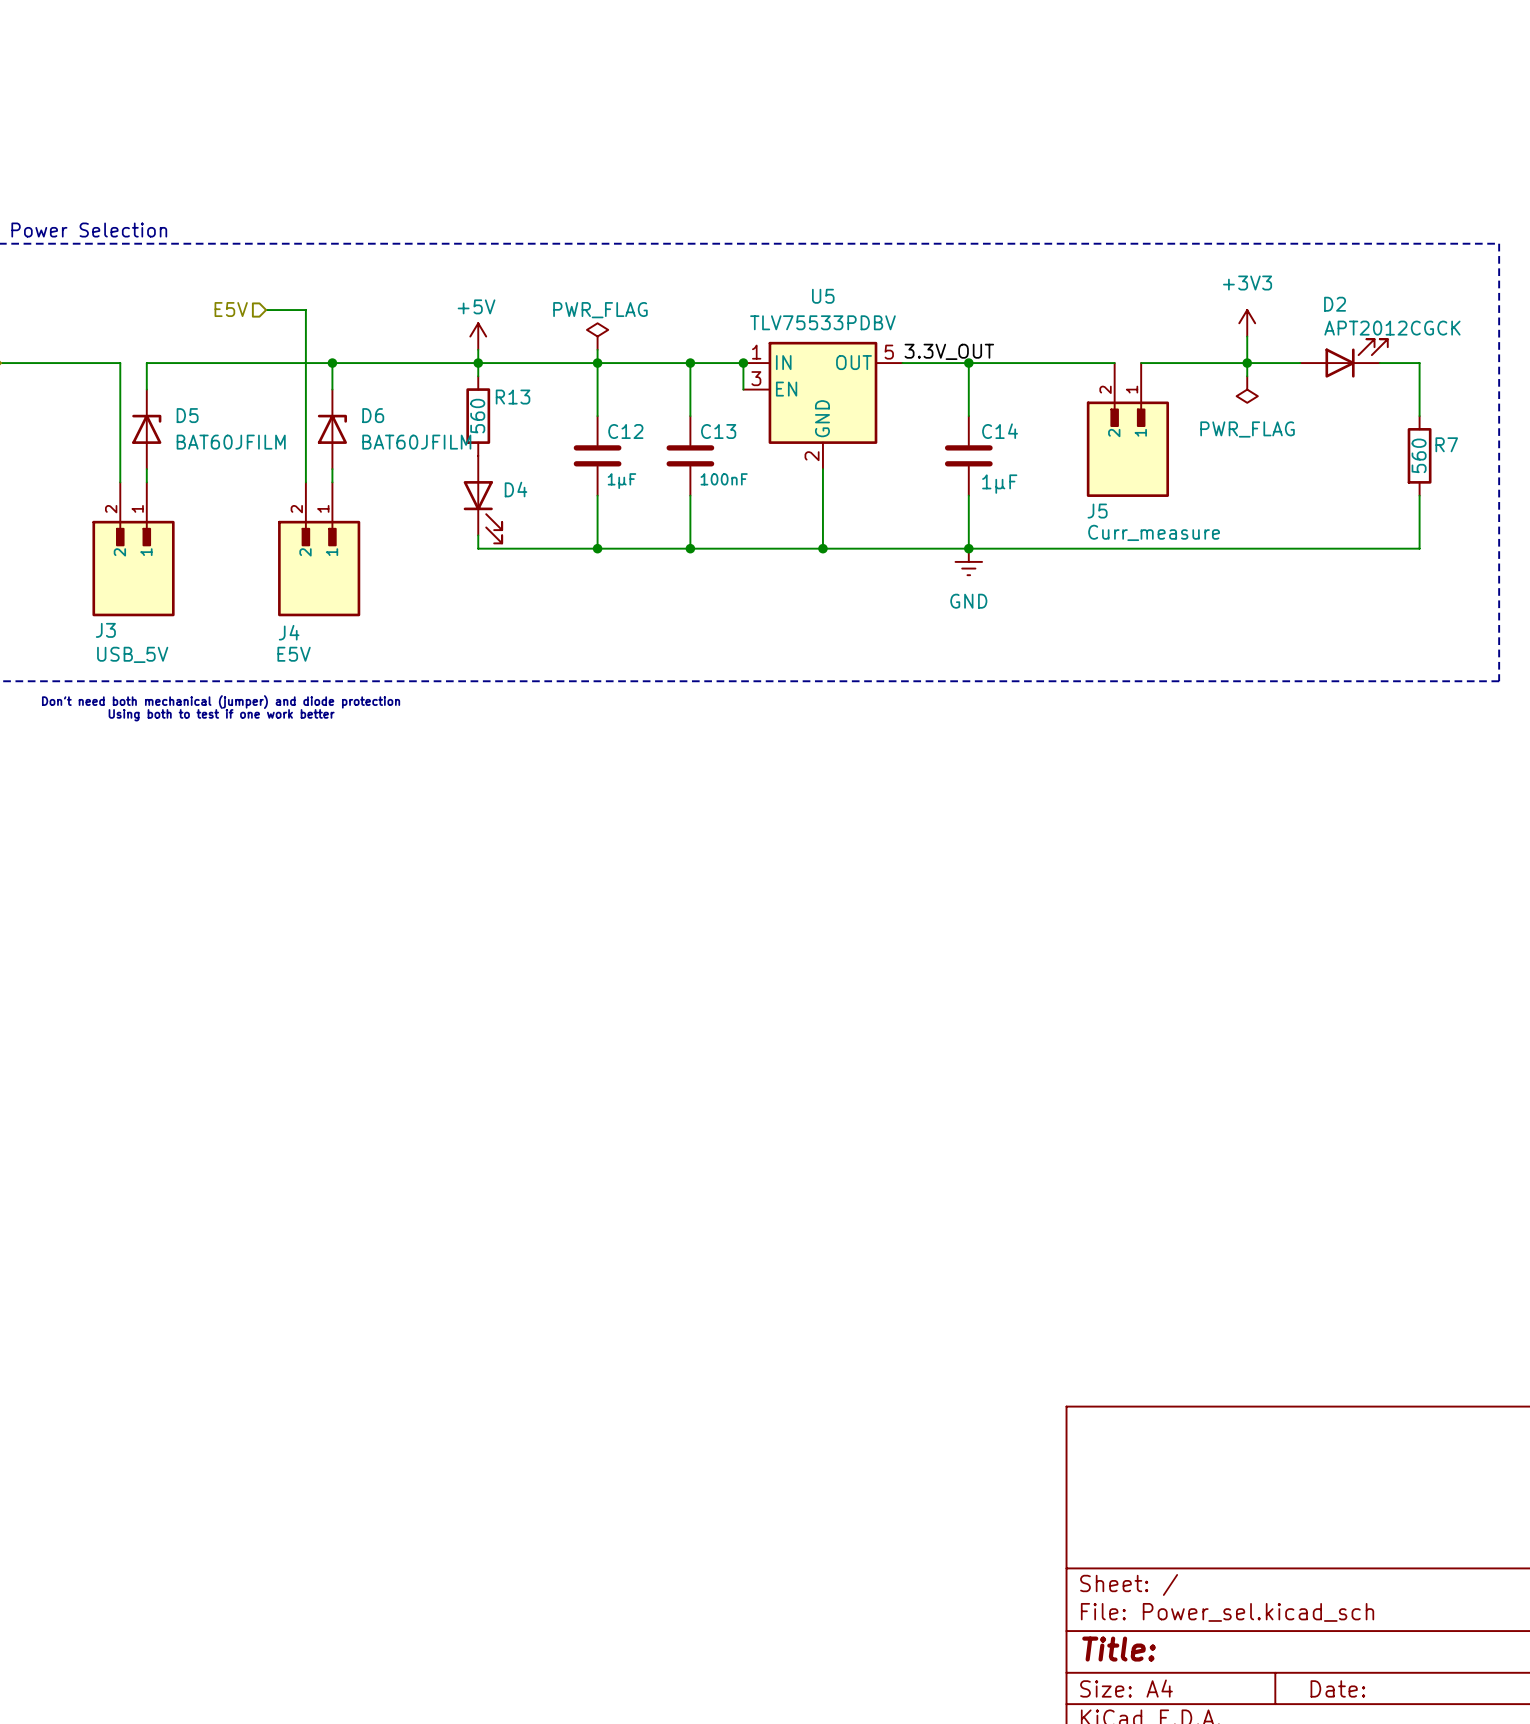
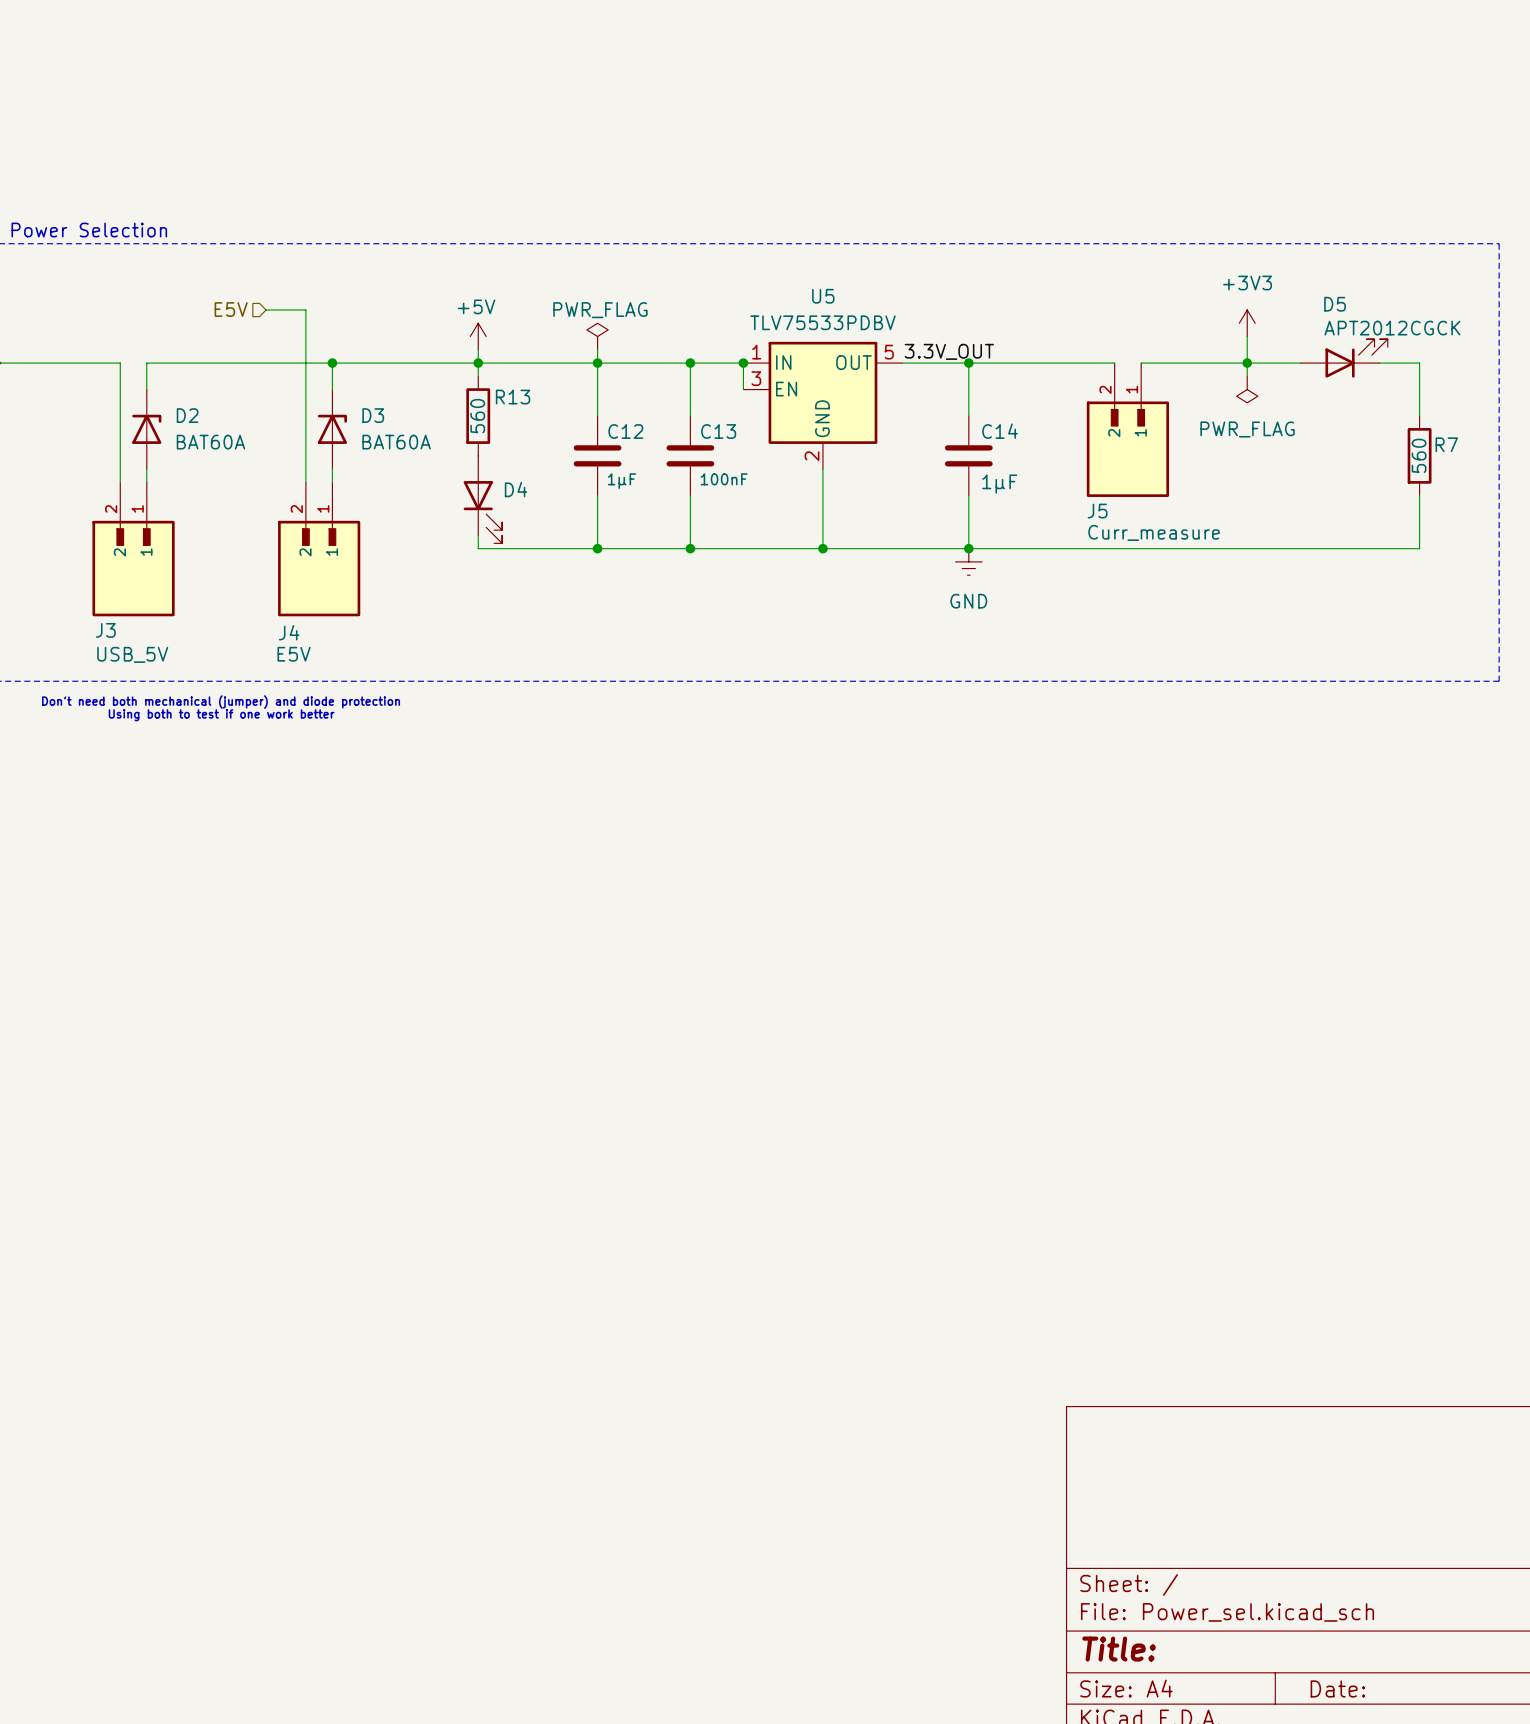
D2 name: D2 (1335, 304) -> D5 (1335, 304)
D5 name: D5 (187, 415) -> D2 (187, 415)
D6 name: D6 (373, 415) -> D3 (373, 415)
D5 value: BAT60JFILM (231, 442) -> BAT60A (210, 442)
D6 value: BAT60JFILM (416, 442) -> BAT60A (396, 442)

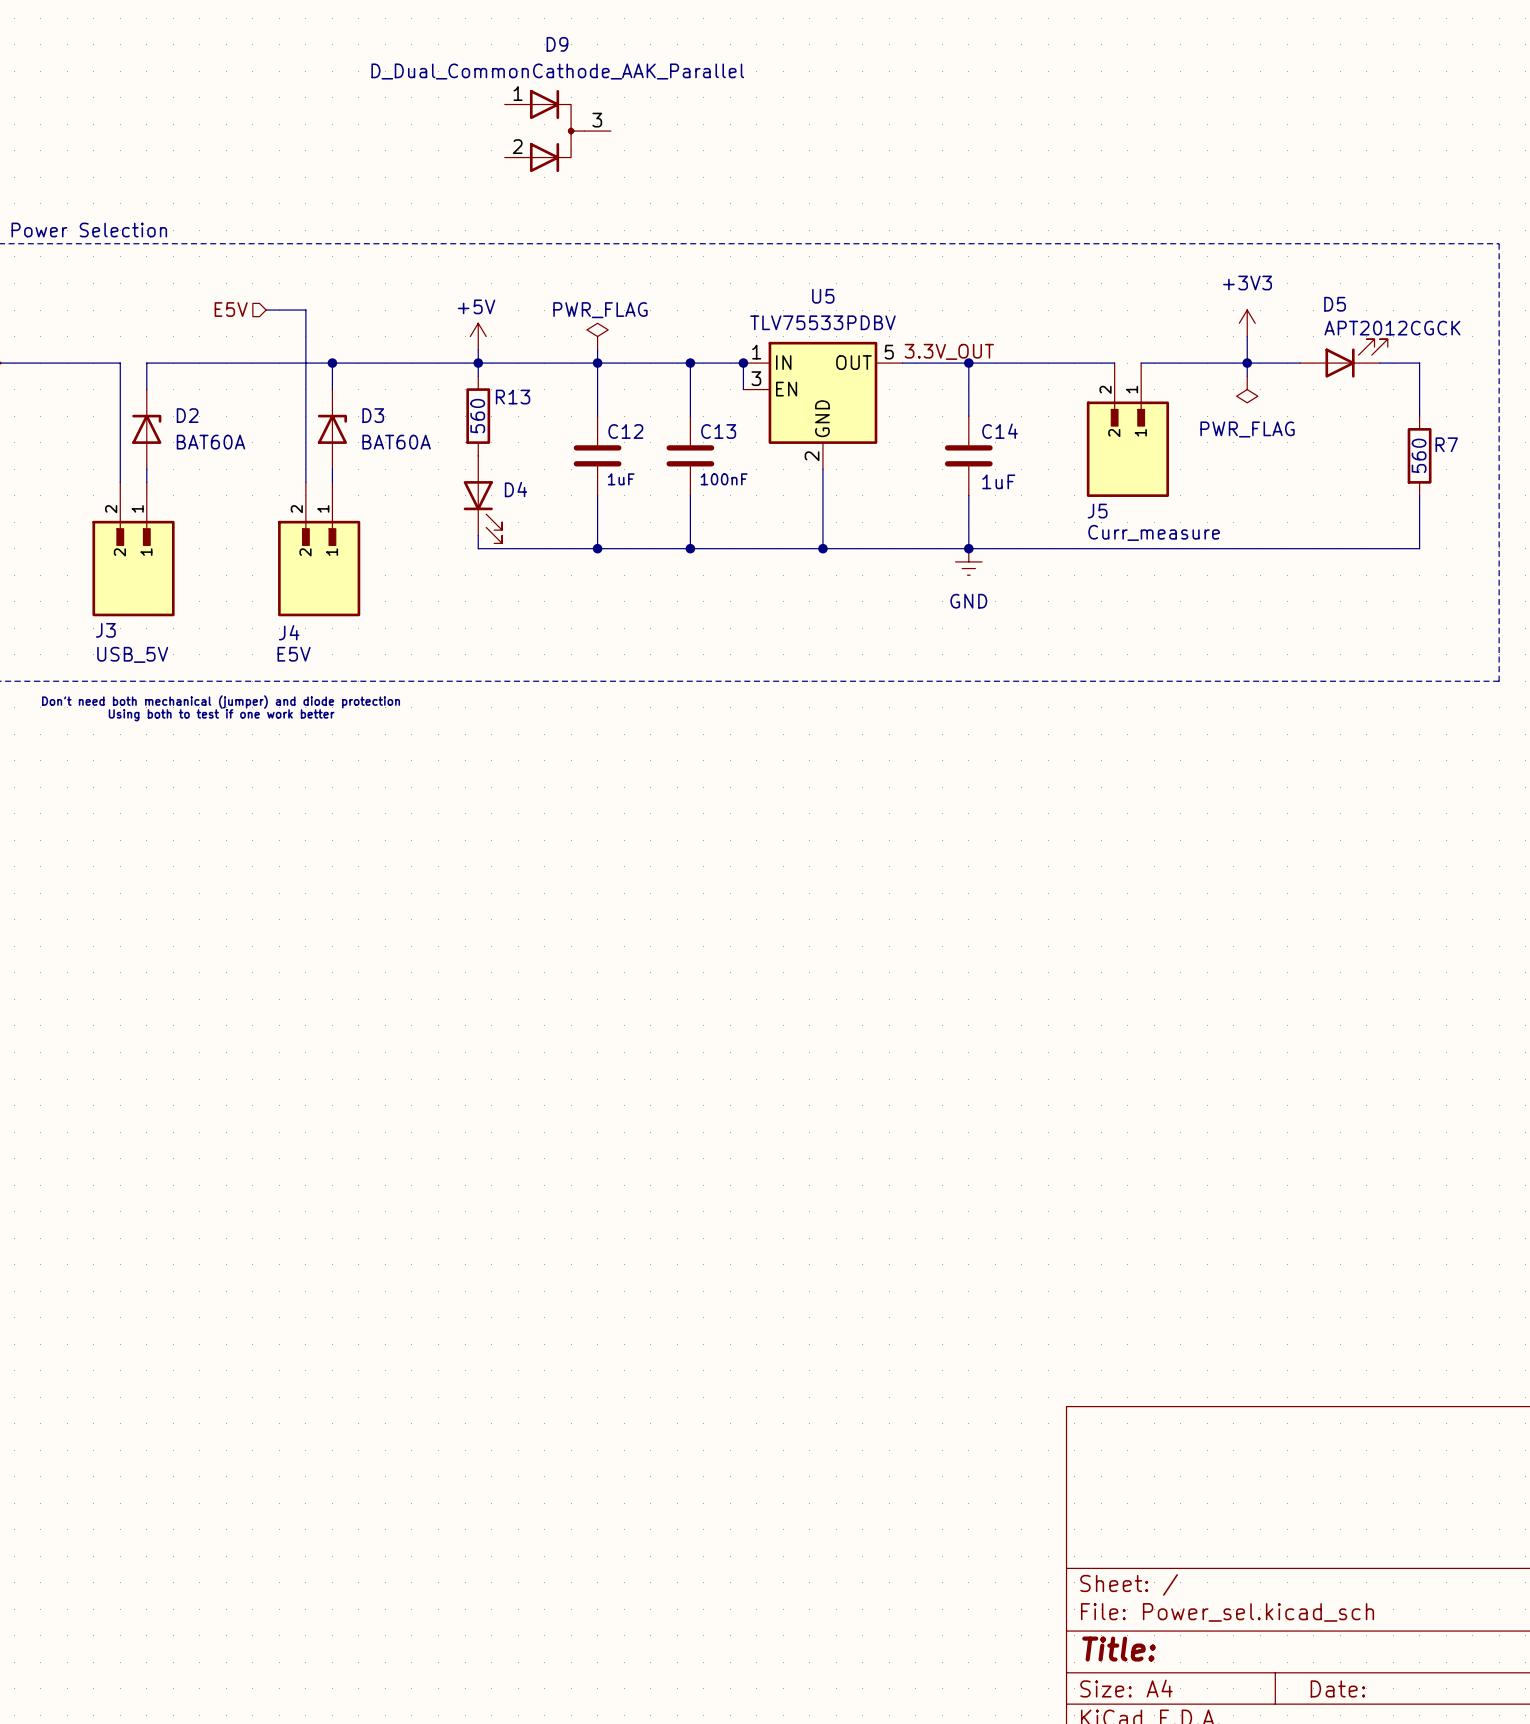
D9: none -> D_Dual_CommonCathode_AAK_Parallel (557, 131)
C12 value: 1μF (621, 481) -> 1uF (621, 479)
C14 value: 1μF (999, 484) -> 1uF (998, 481)

